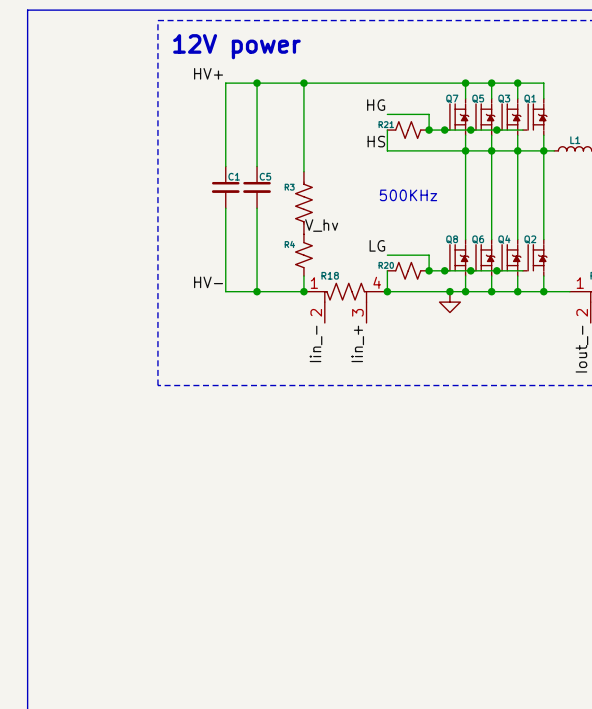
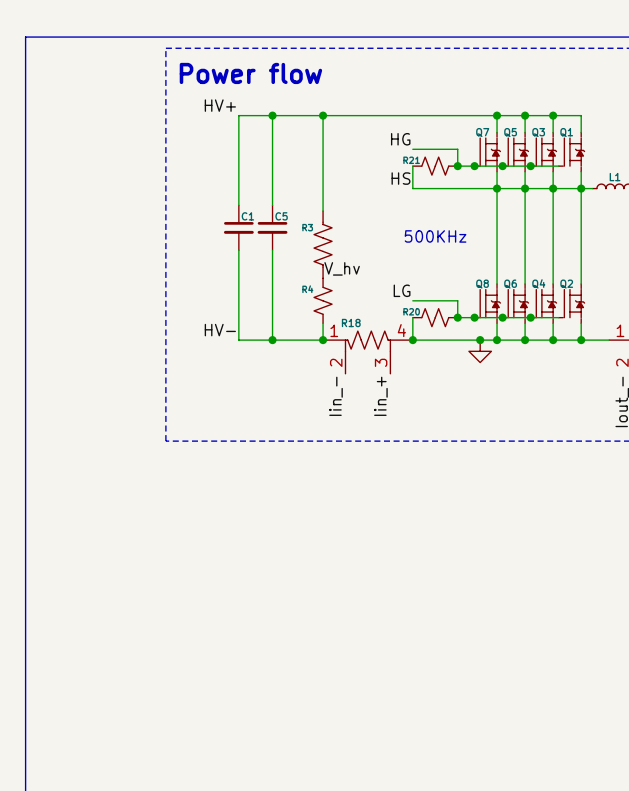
text: 12V power (236, 46) -> Power flow (250, 73)

